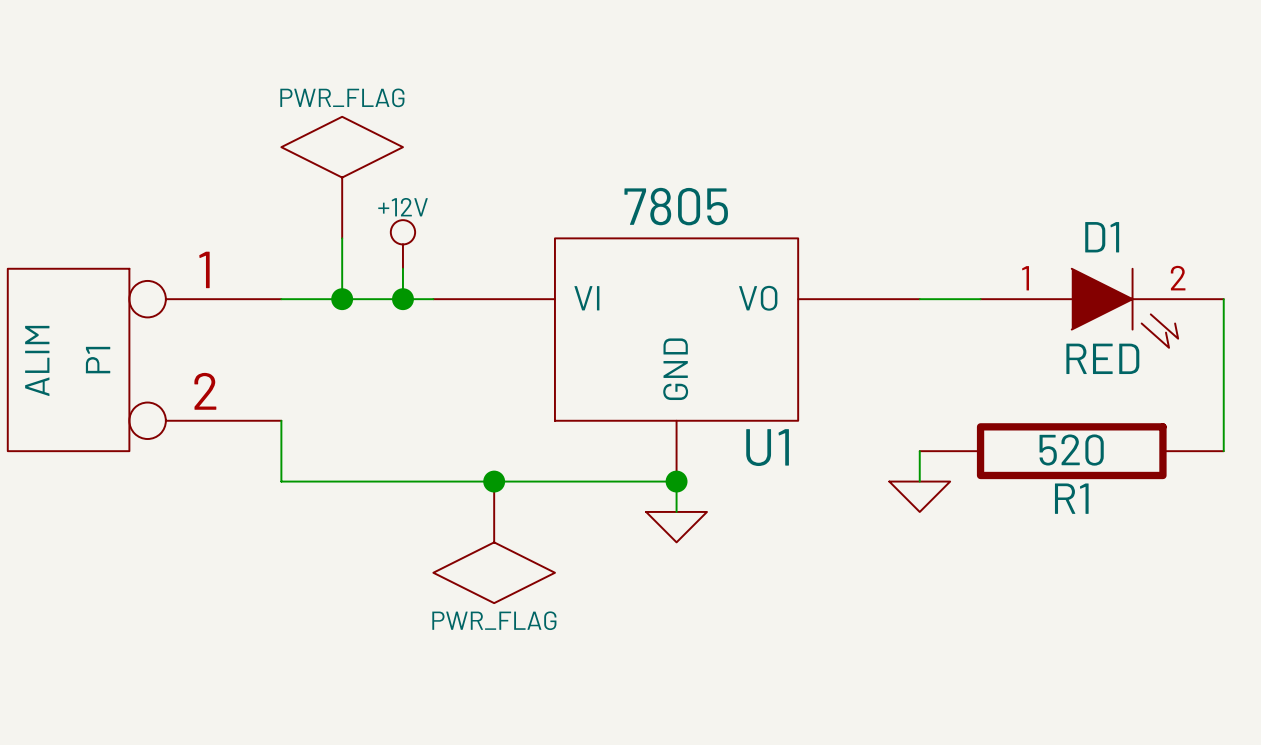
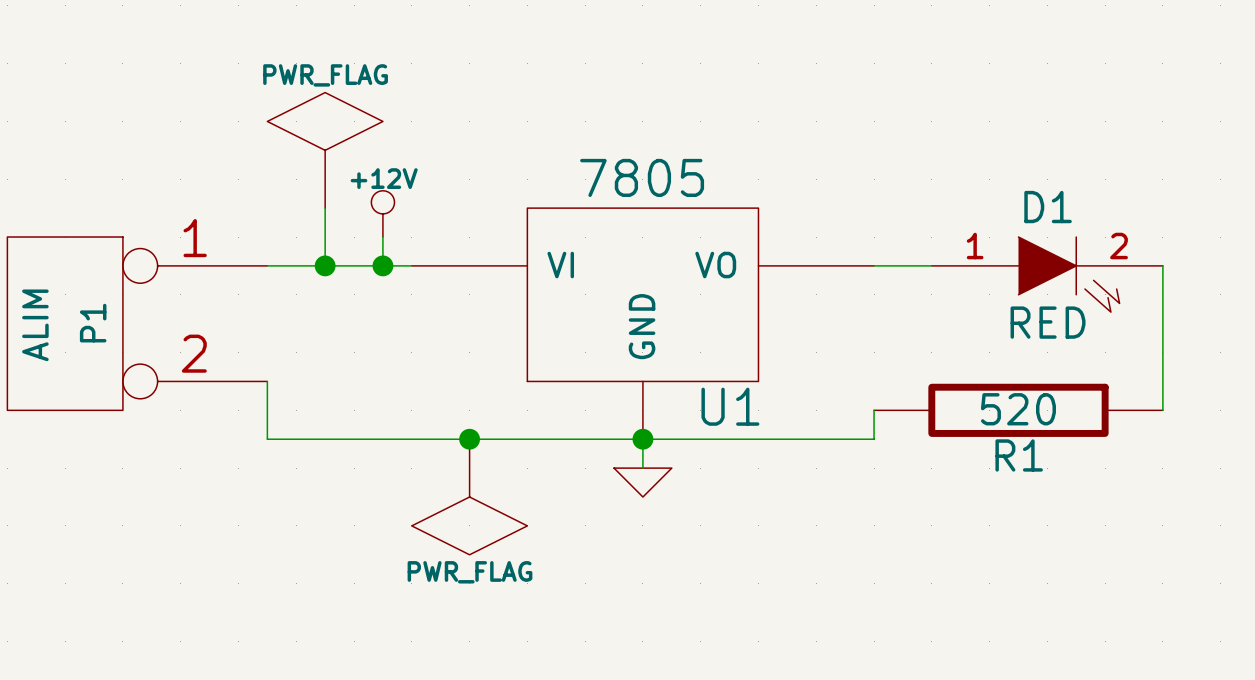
wire: none -> (642, 439) (874, 439)
power symbol: (919, 496) -> none

